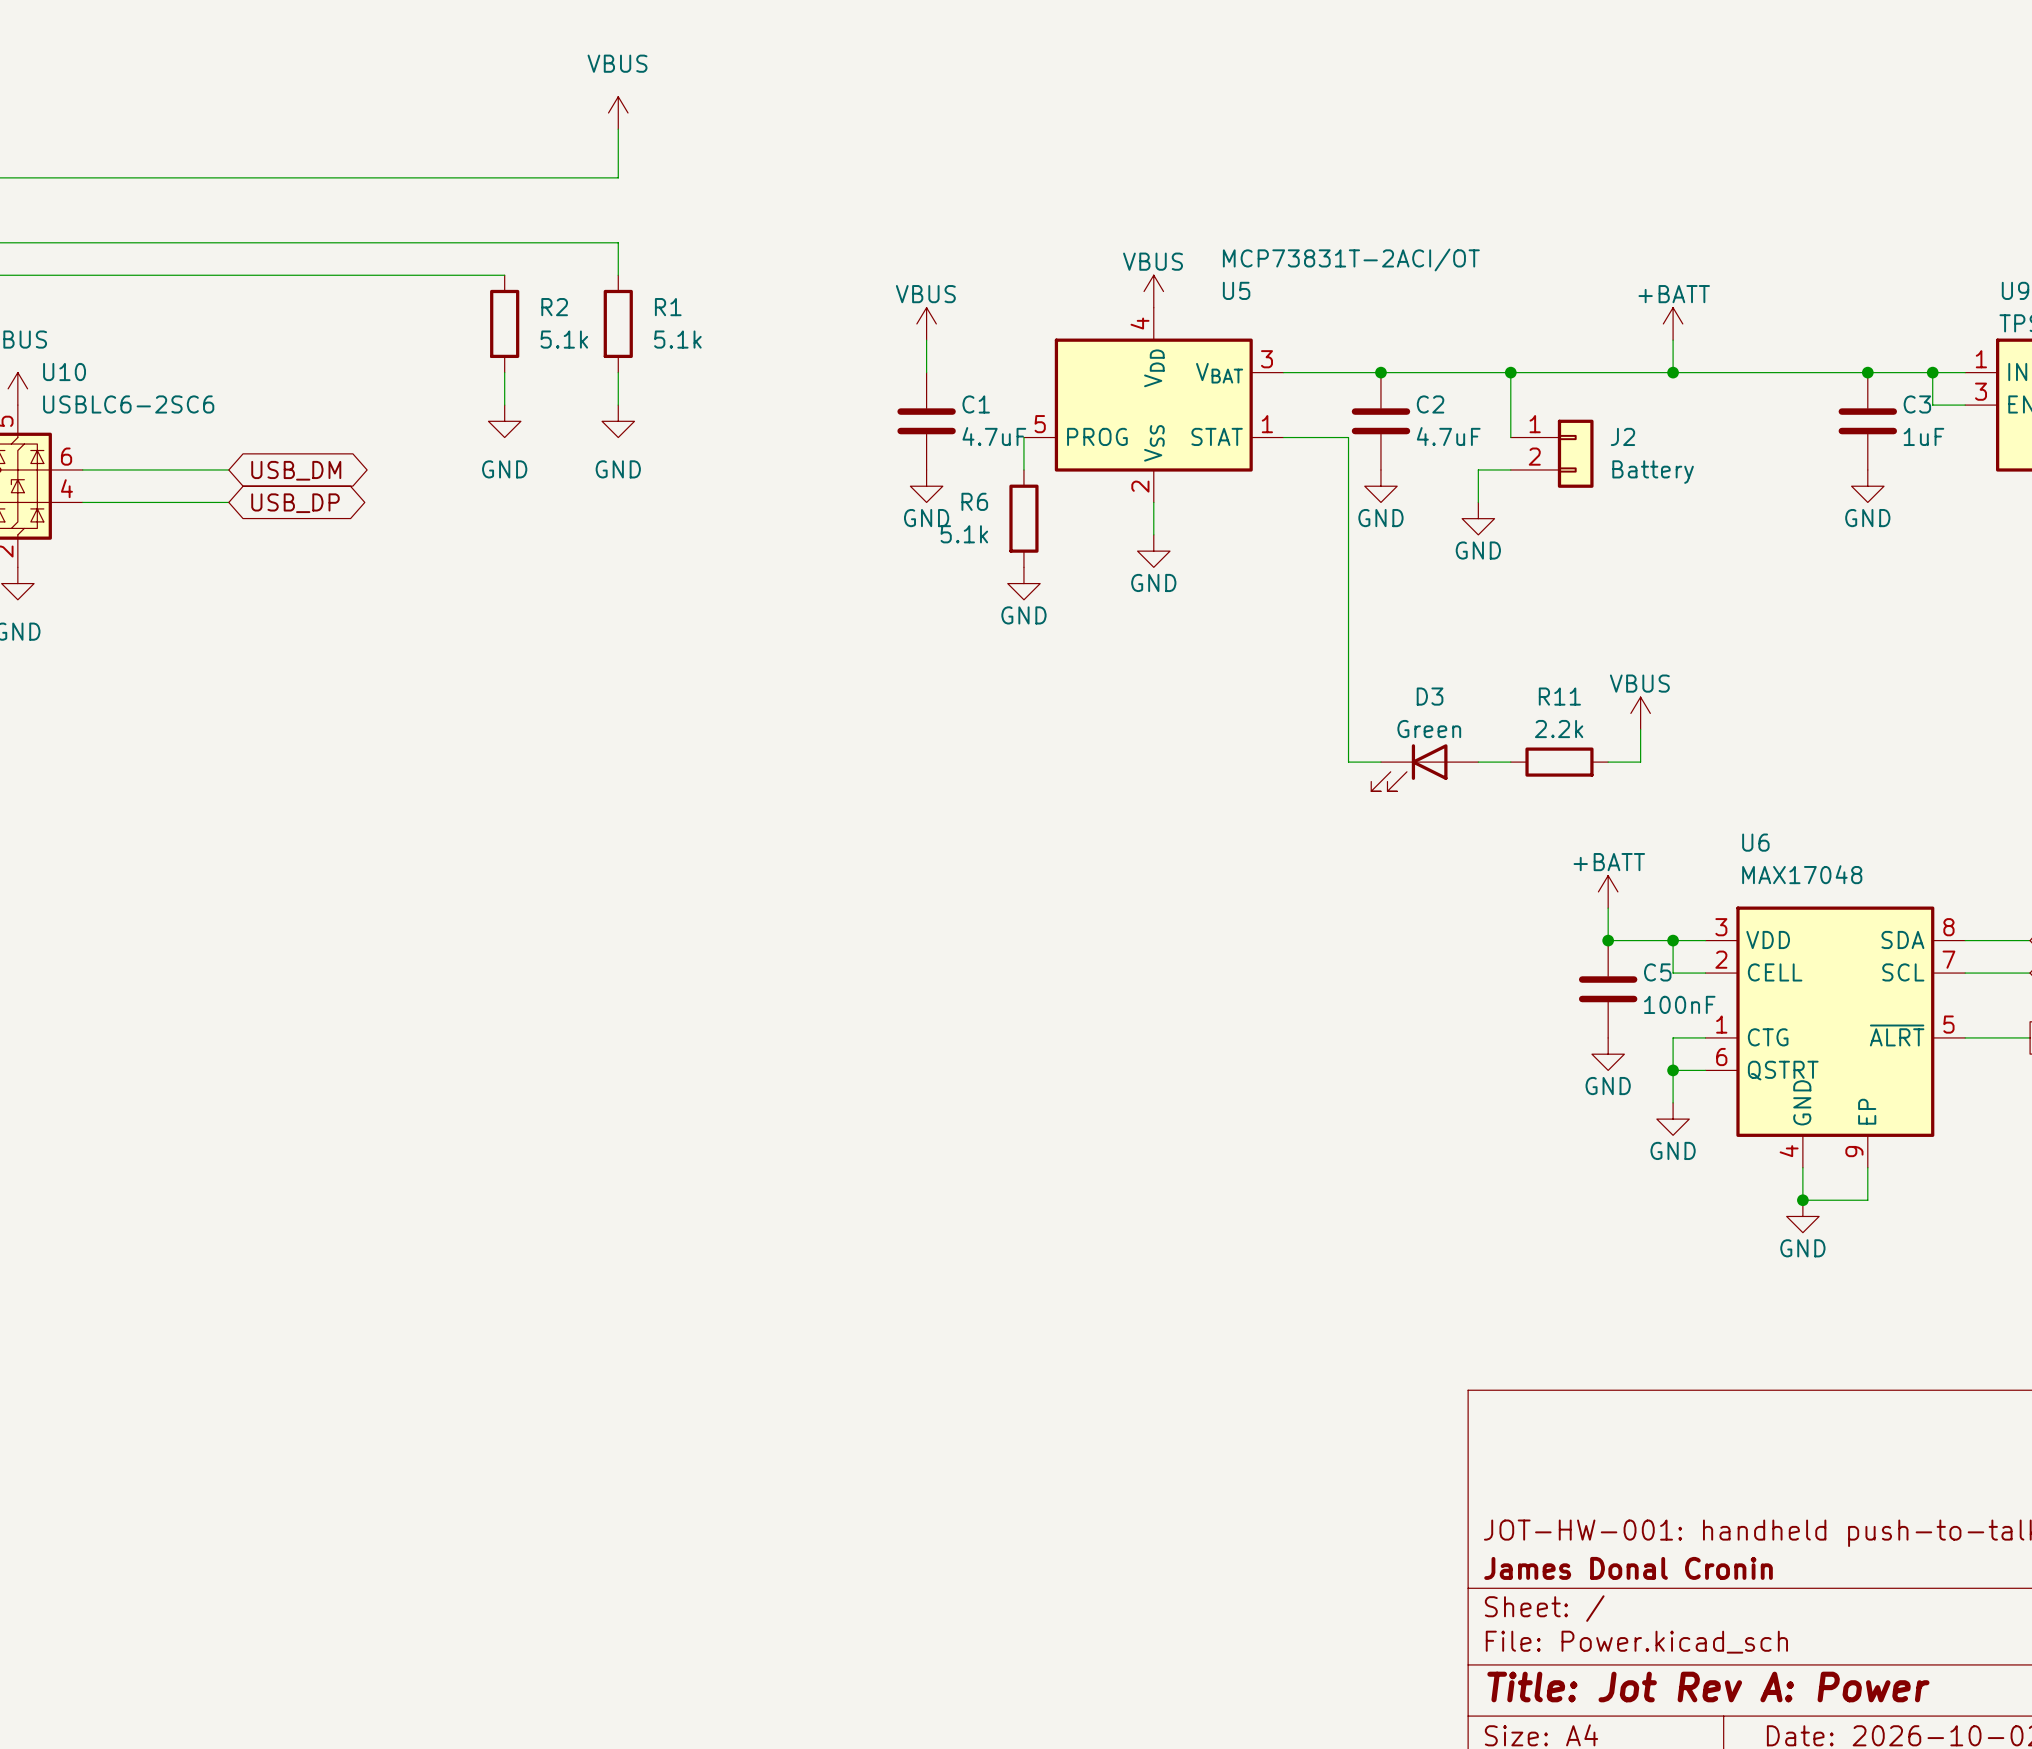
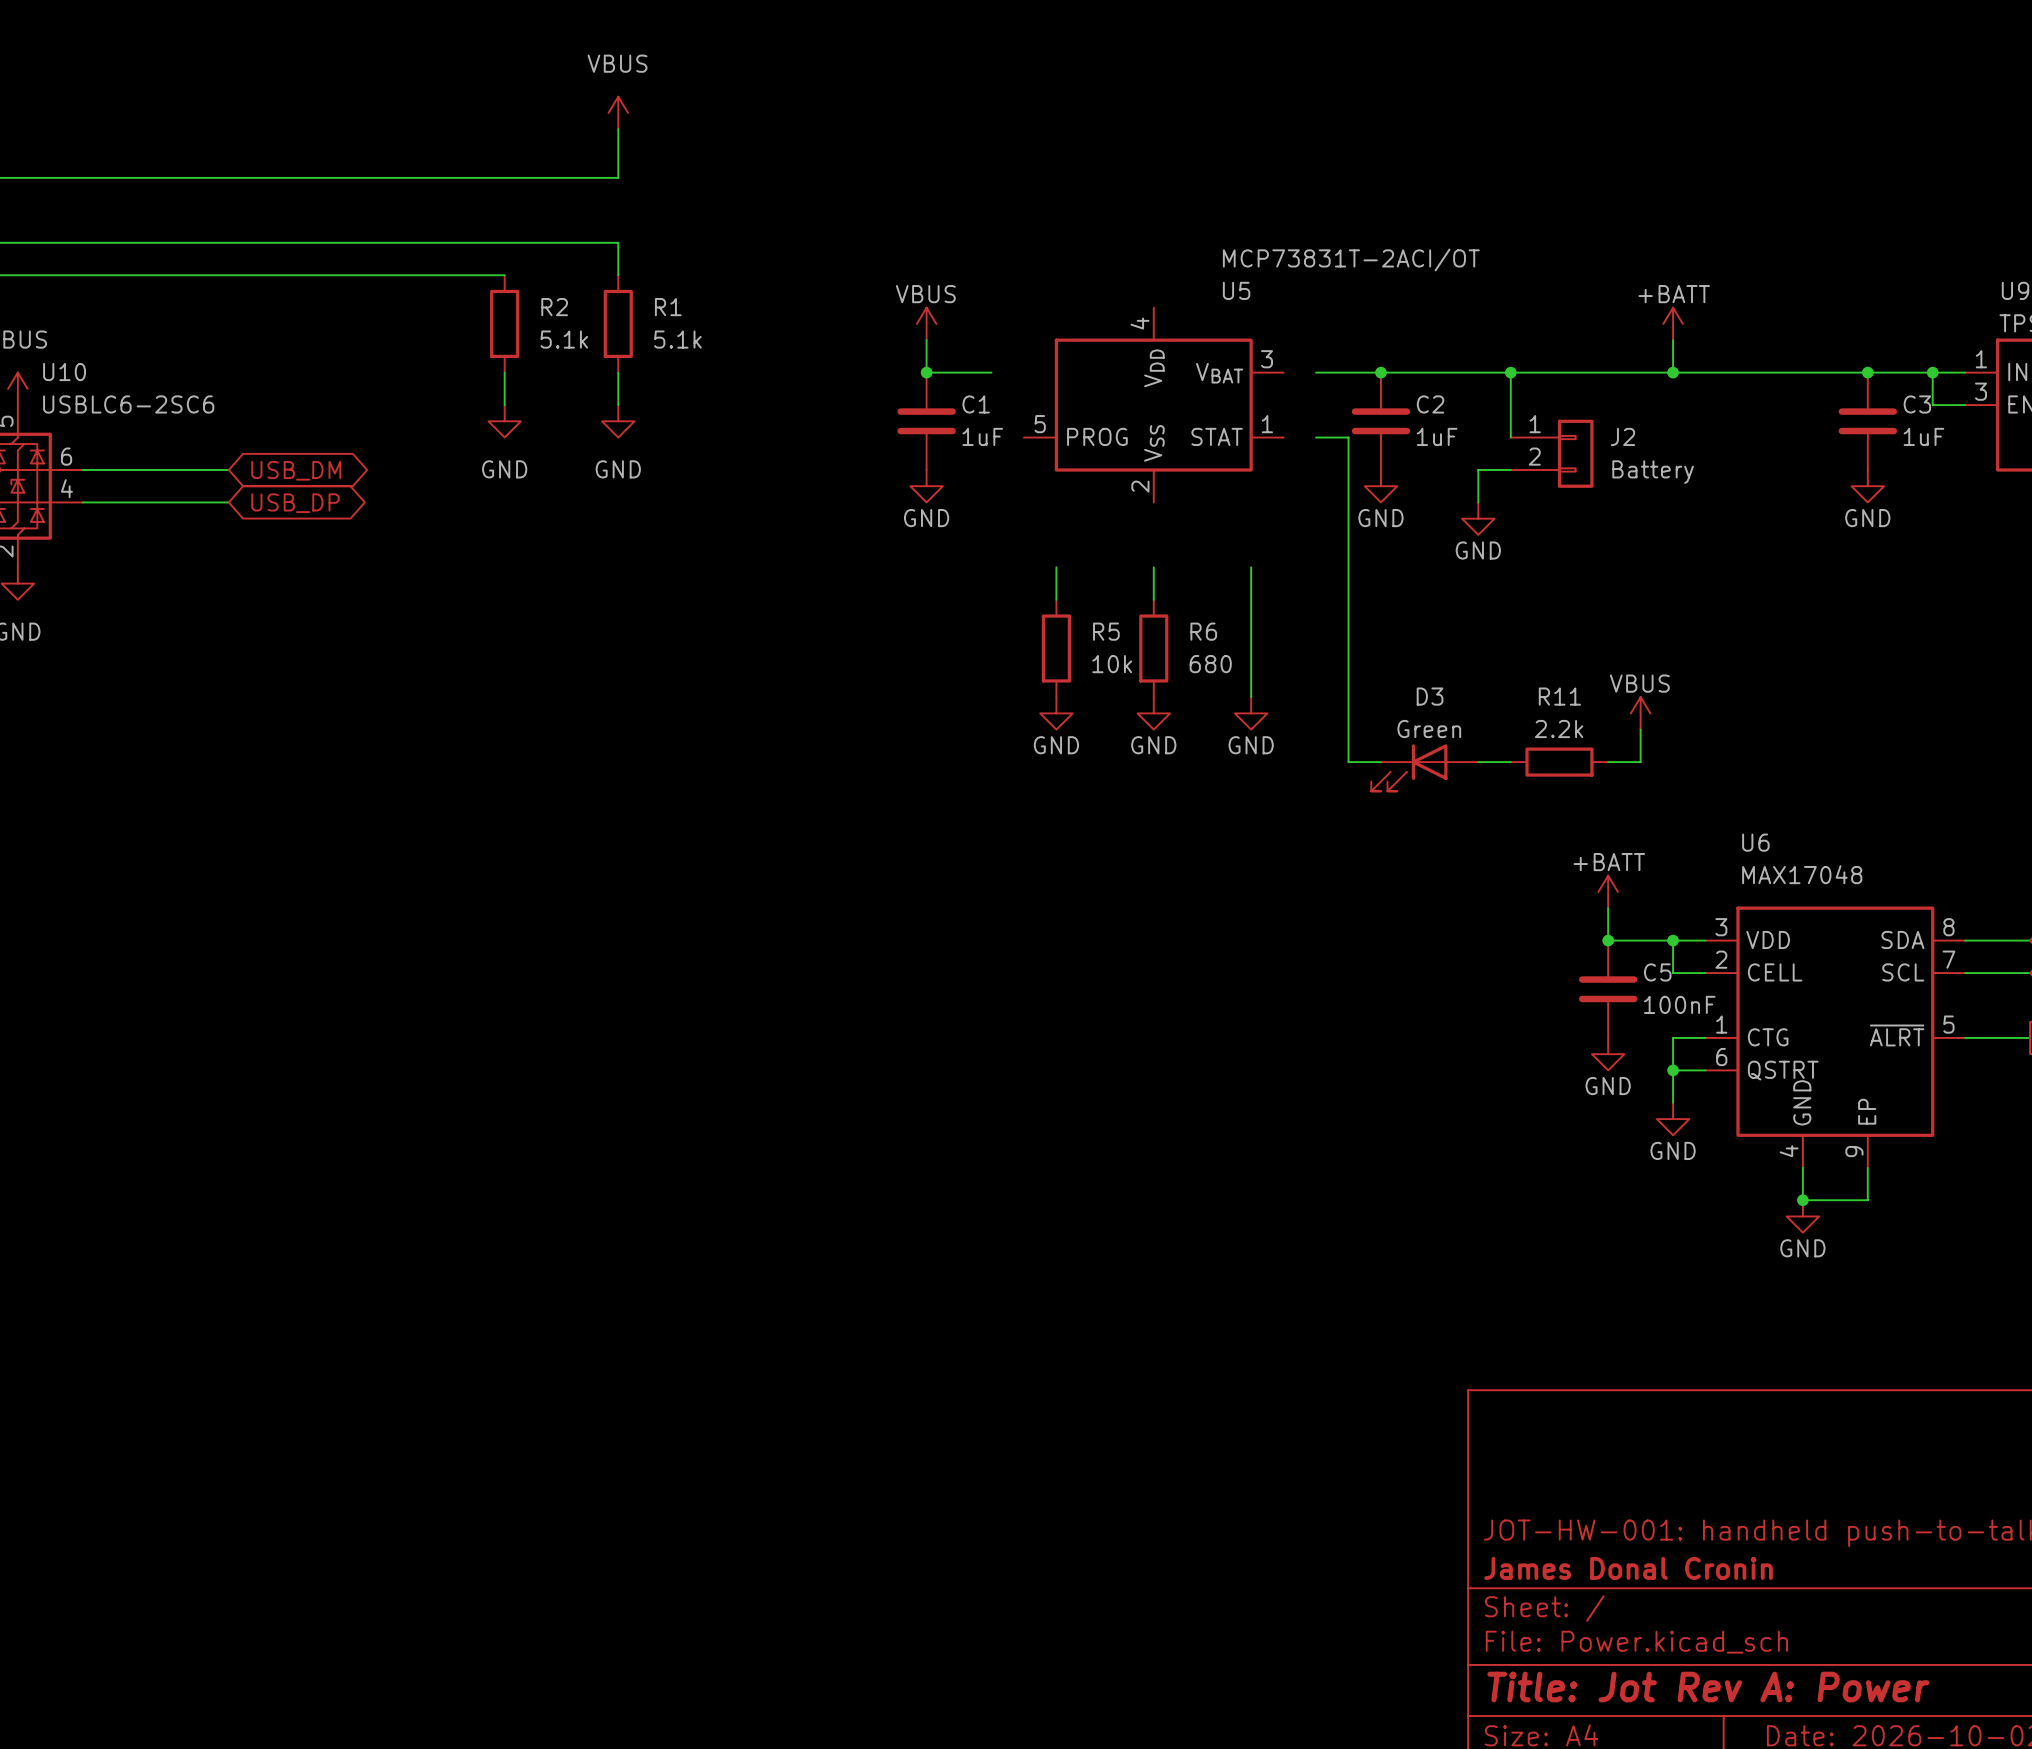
power symbol: VBUS (1153, 291) -> none
wire: none -> (926, 372) (991, 372)
junction: none -> (926, 372)
wire: (1283, 372) (1316, 372) -> none
C1 value: 4.7uF (994, 436) -> 1uF (982, 436)
C2 value: 4.7uF (1448, 436) -> 1uF (1437, 436)
wire: (1023, 437) (1023, 469) -> (1056, 567) (1056, 599)
wire: (1283, 437) (1316, 437) -> none
R6 name position: R6 (974, 501) -> R6 (1203, 631)
wire: (1153, 502) (1153, 534) -> (1153, 567) (1153, 599)
R6 position: (1023, 518) -> (1153, 648)
R6 value: 5.1k (964, 534) -> 680 (1210, 664)
power symbol: GND (1153, 551) -> none
wire: none -> (1251, 567) (1251, 697)
power symbol: GND (1023, 583) -> none
R5: none -> 10k (1056, 648)
power symbol: none -> GND (1056, 713)
power symbol: none -> GND (1153, 713)
power symbol: none -> GND (1251, 713)

